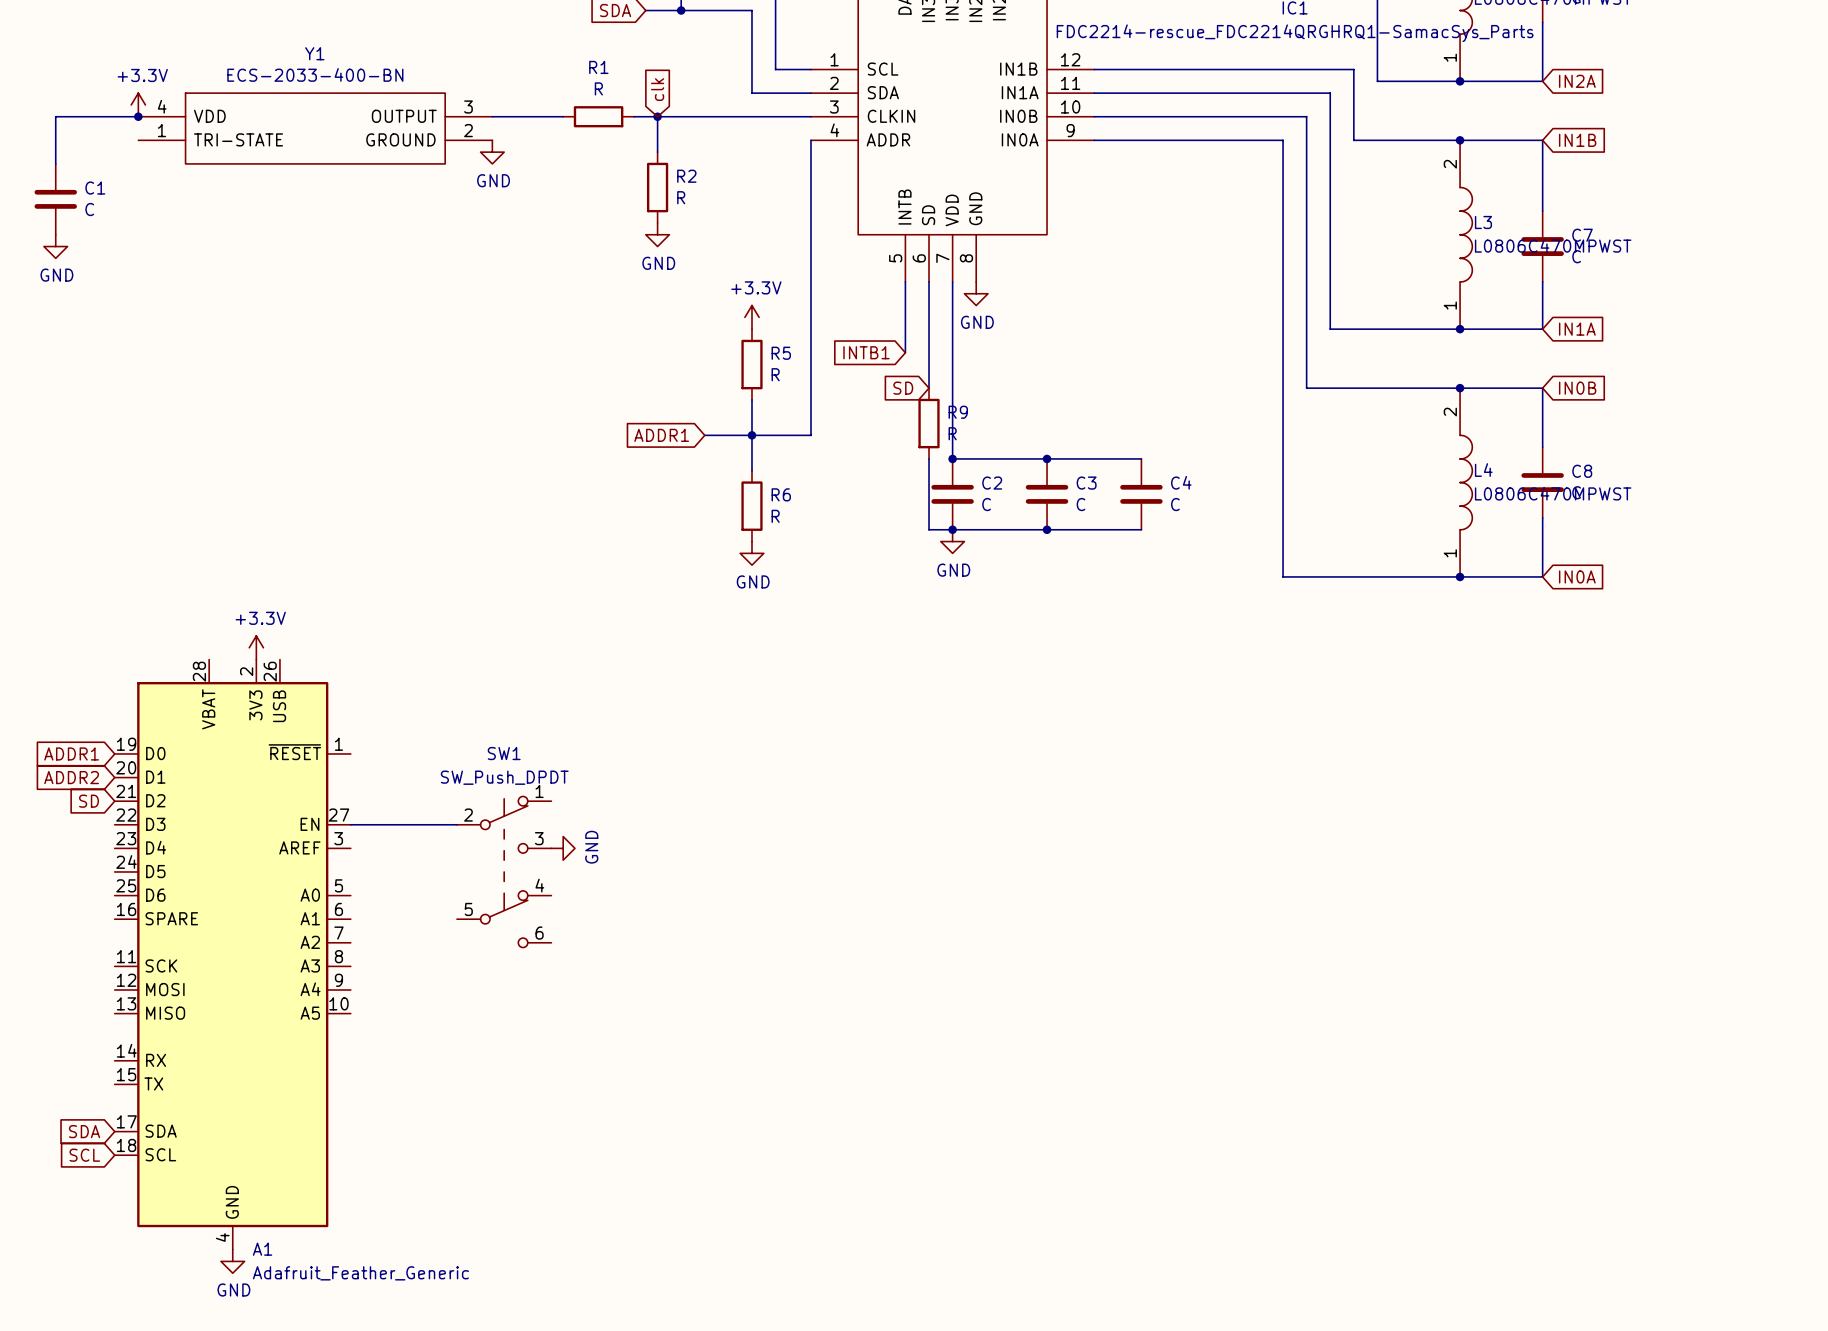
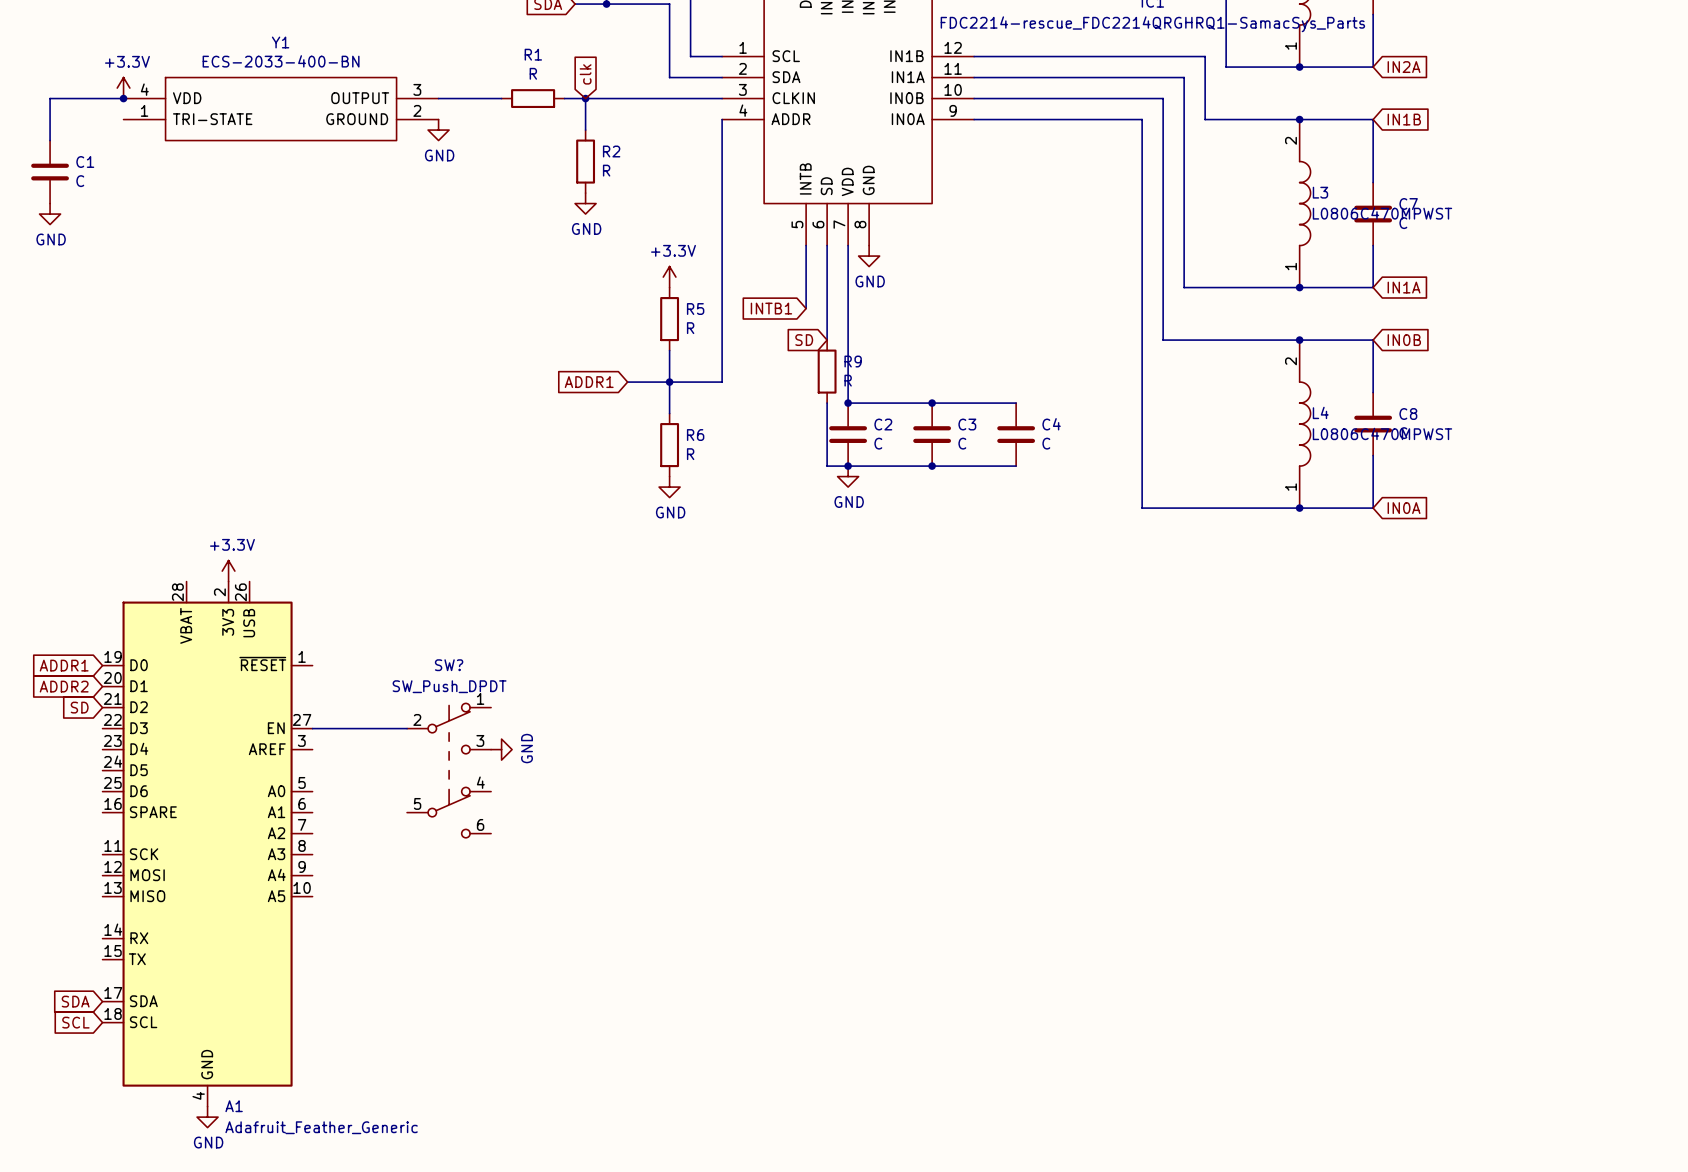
SW1 name: SW1 (504, 753) -> SW? (449, 665)

